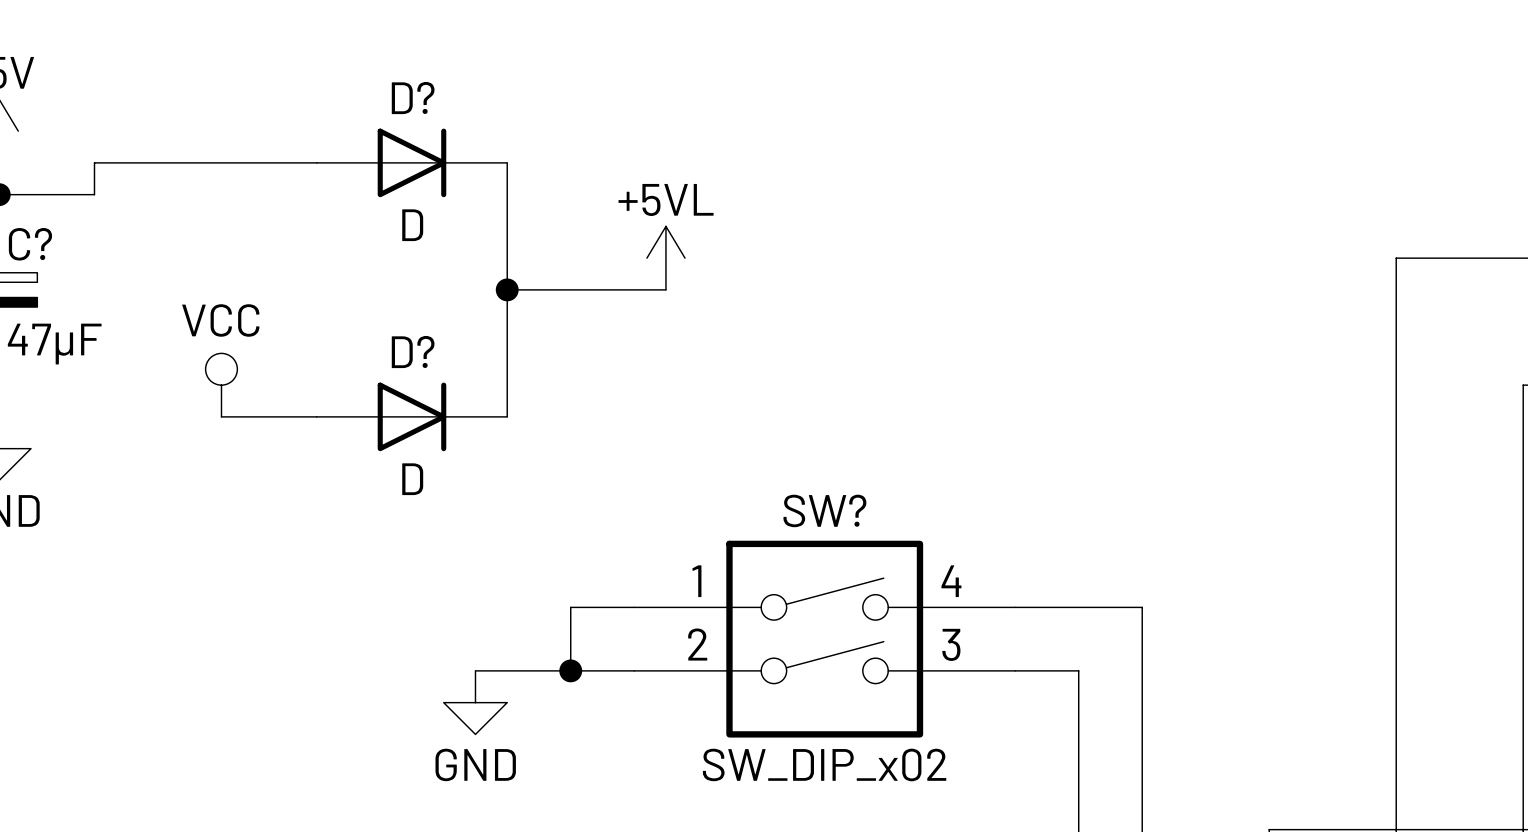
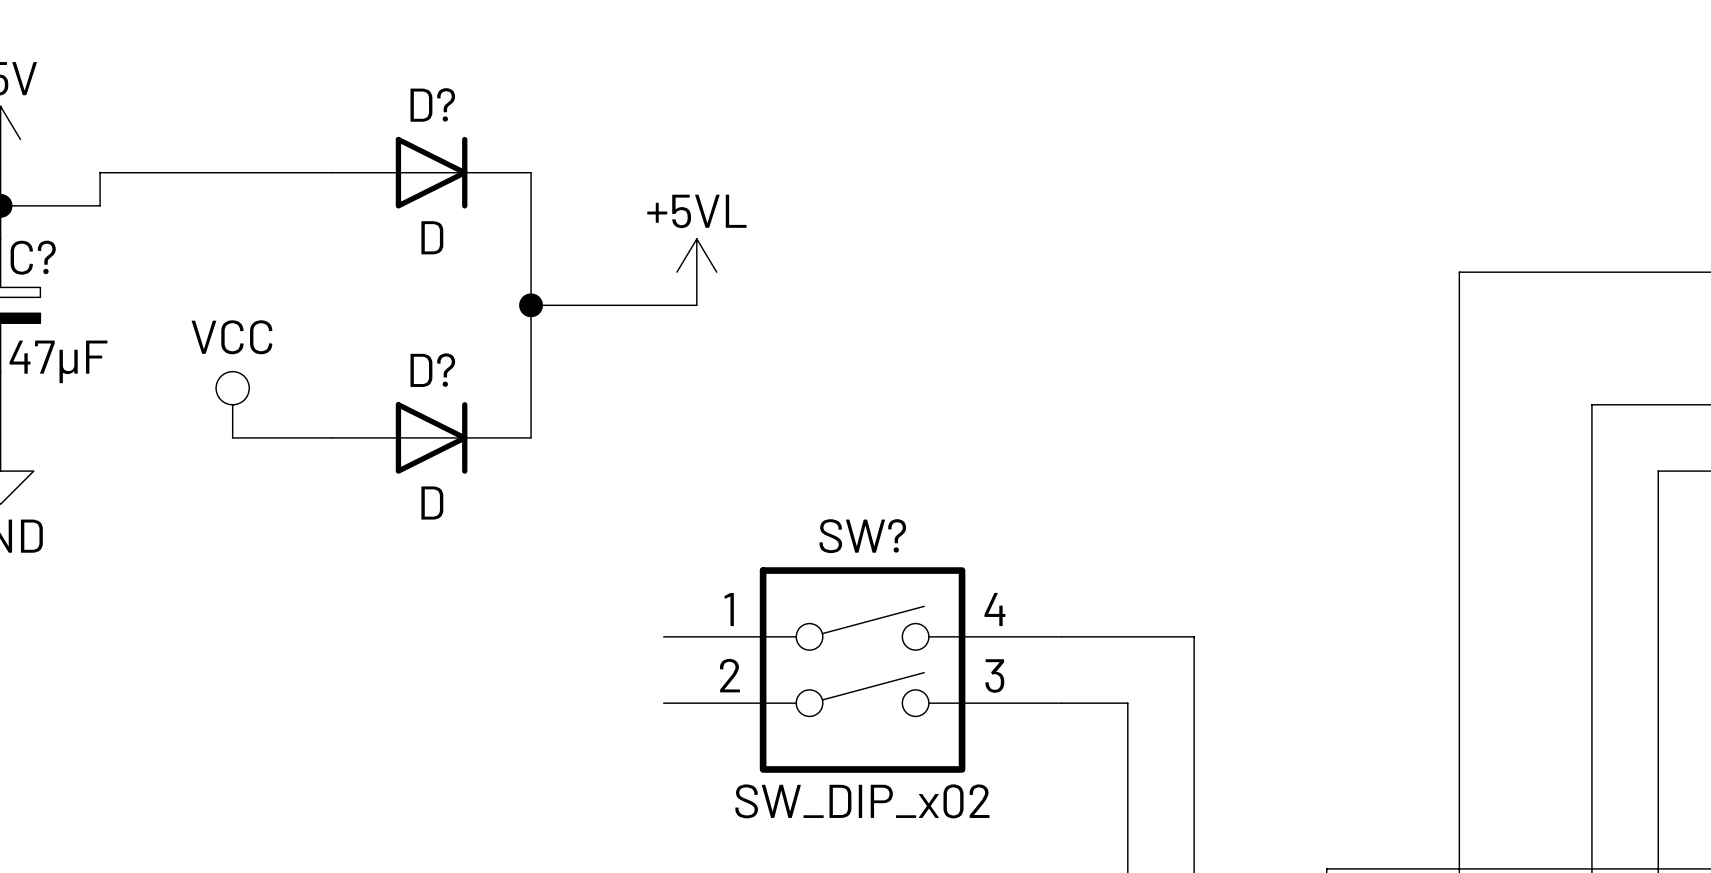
wire: (634, 607) (570, 607) (570, 670) -> none
wire: (475, 670) (634, 670) -> none
junction: (570, 670) -> none
power symbol: GND (475, 702) -> none

